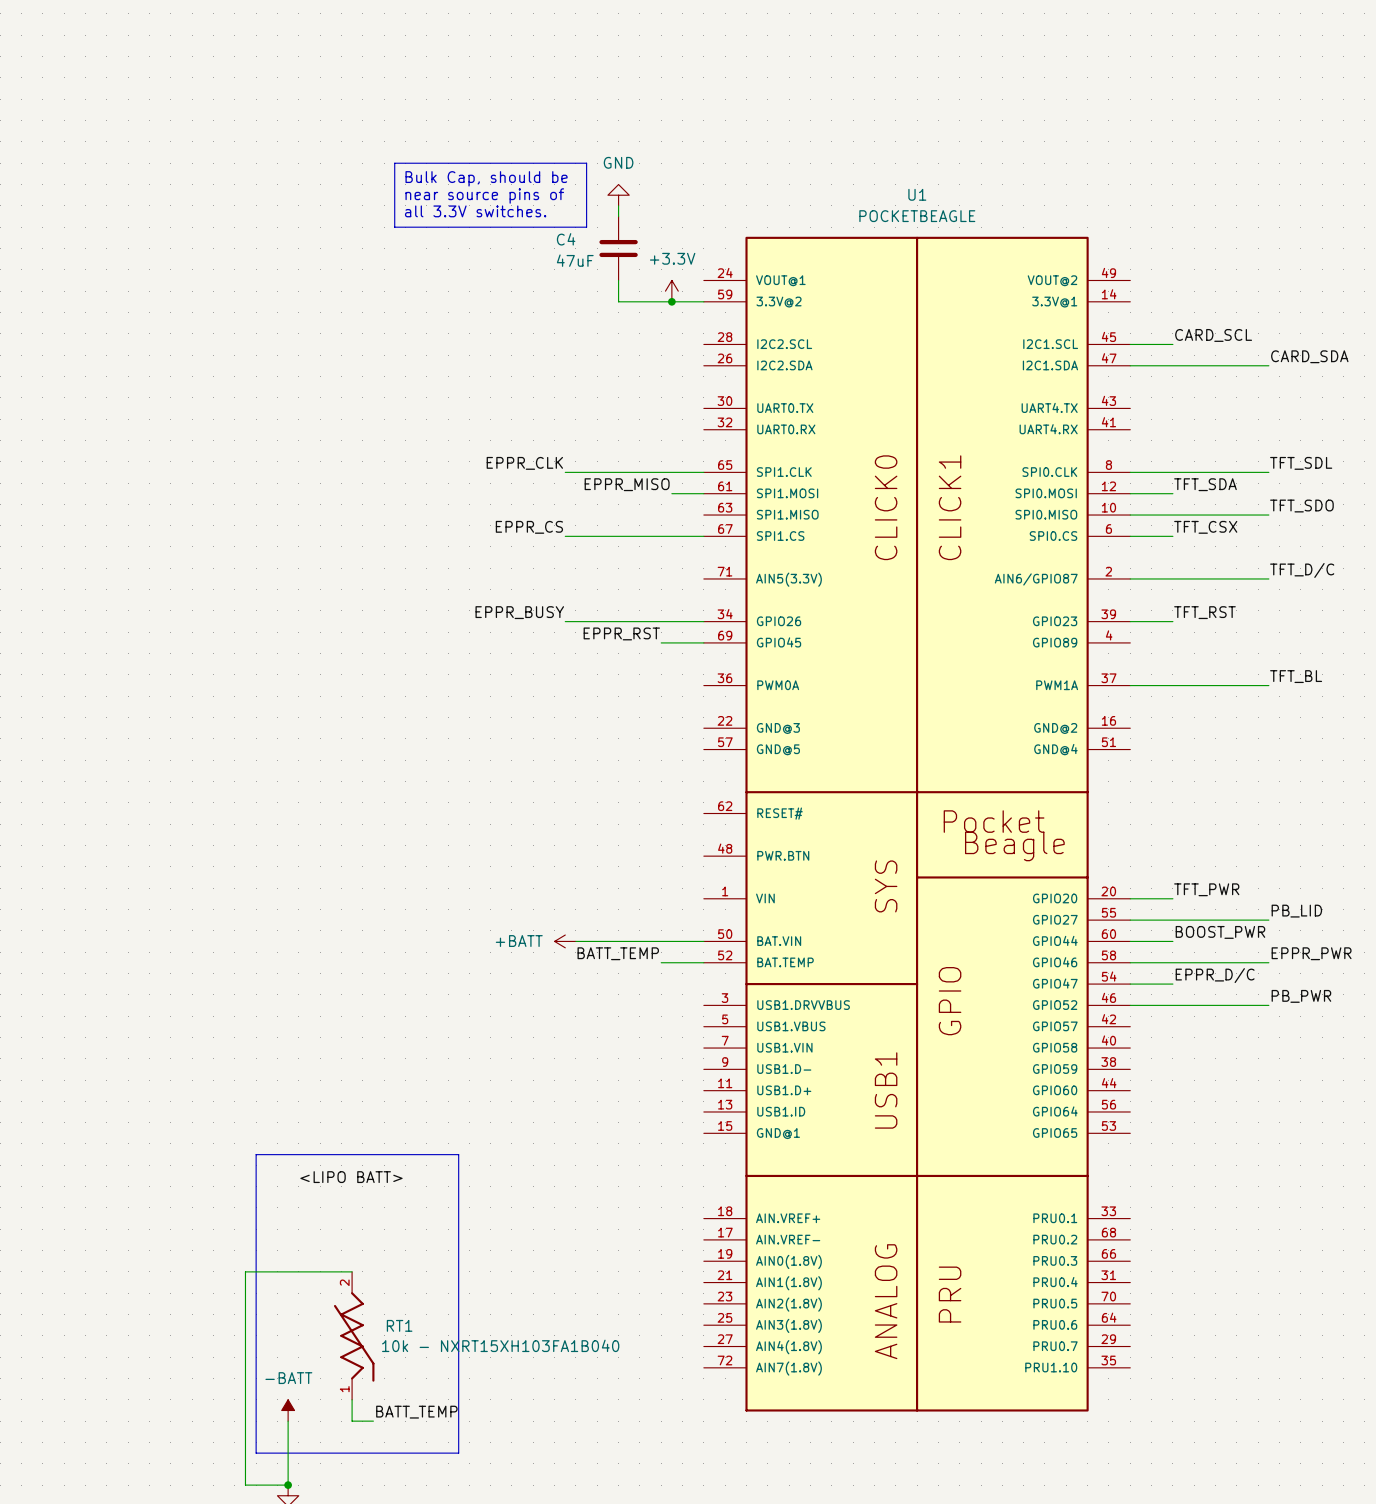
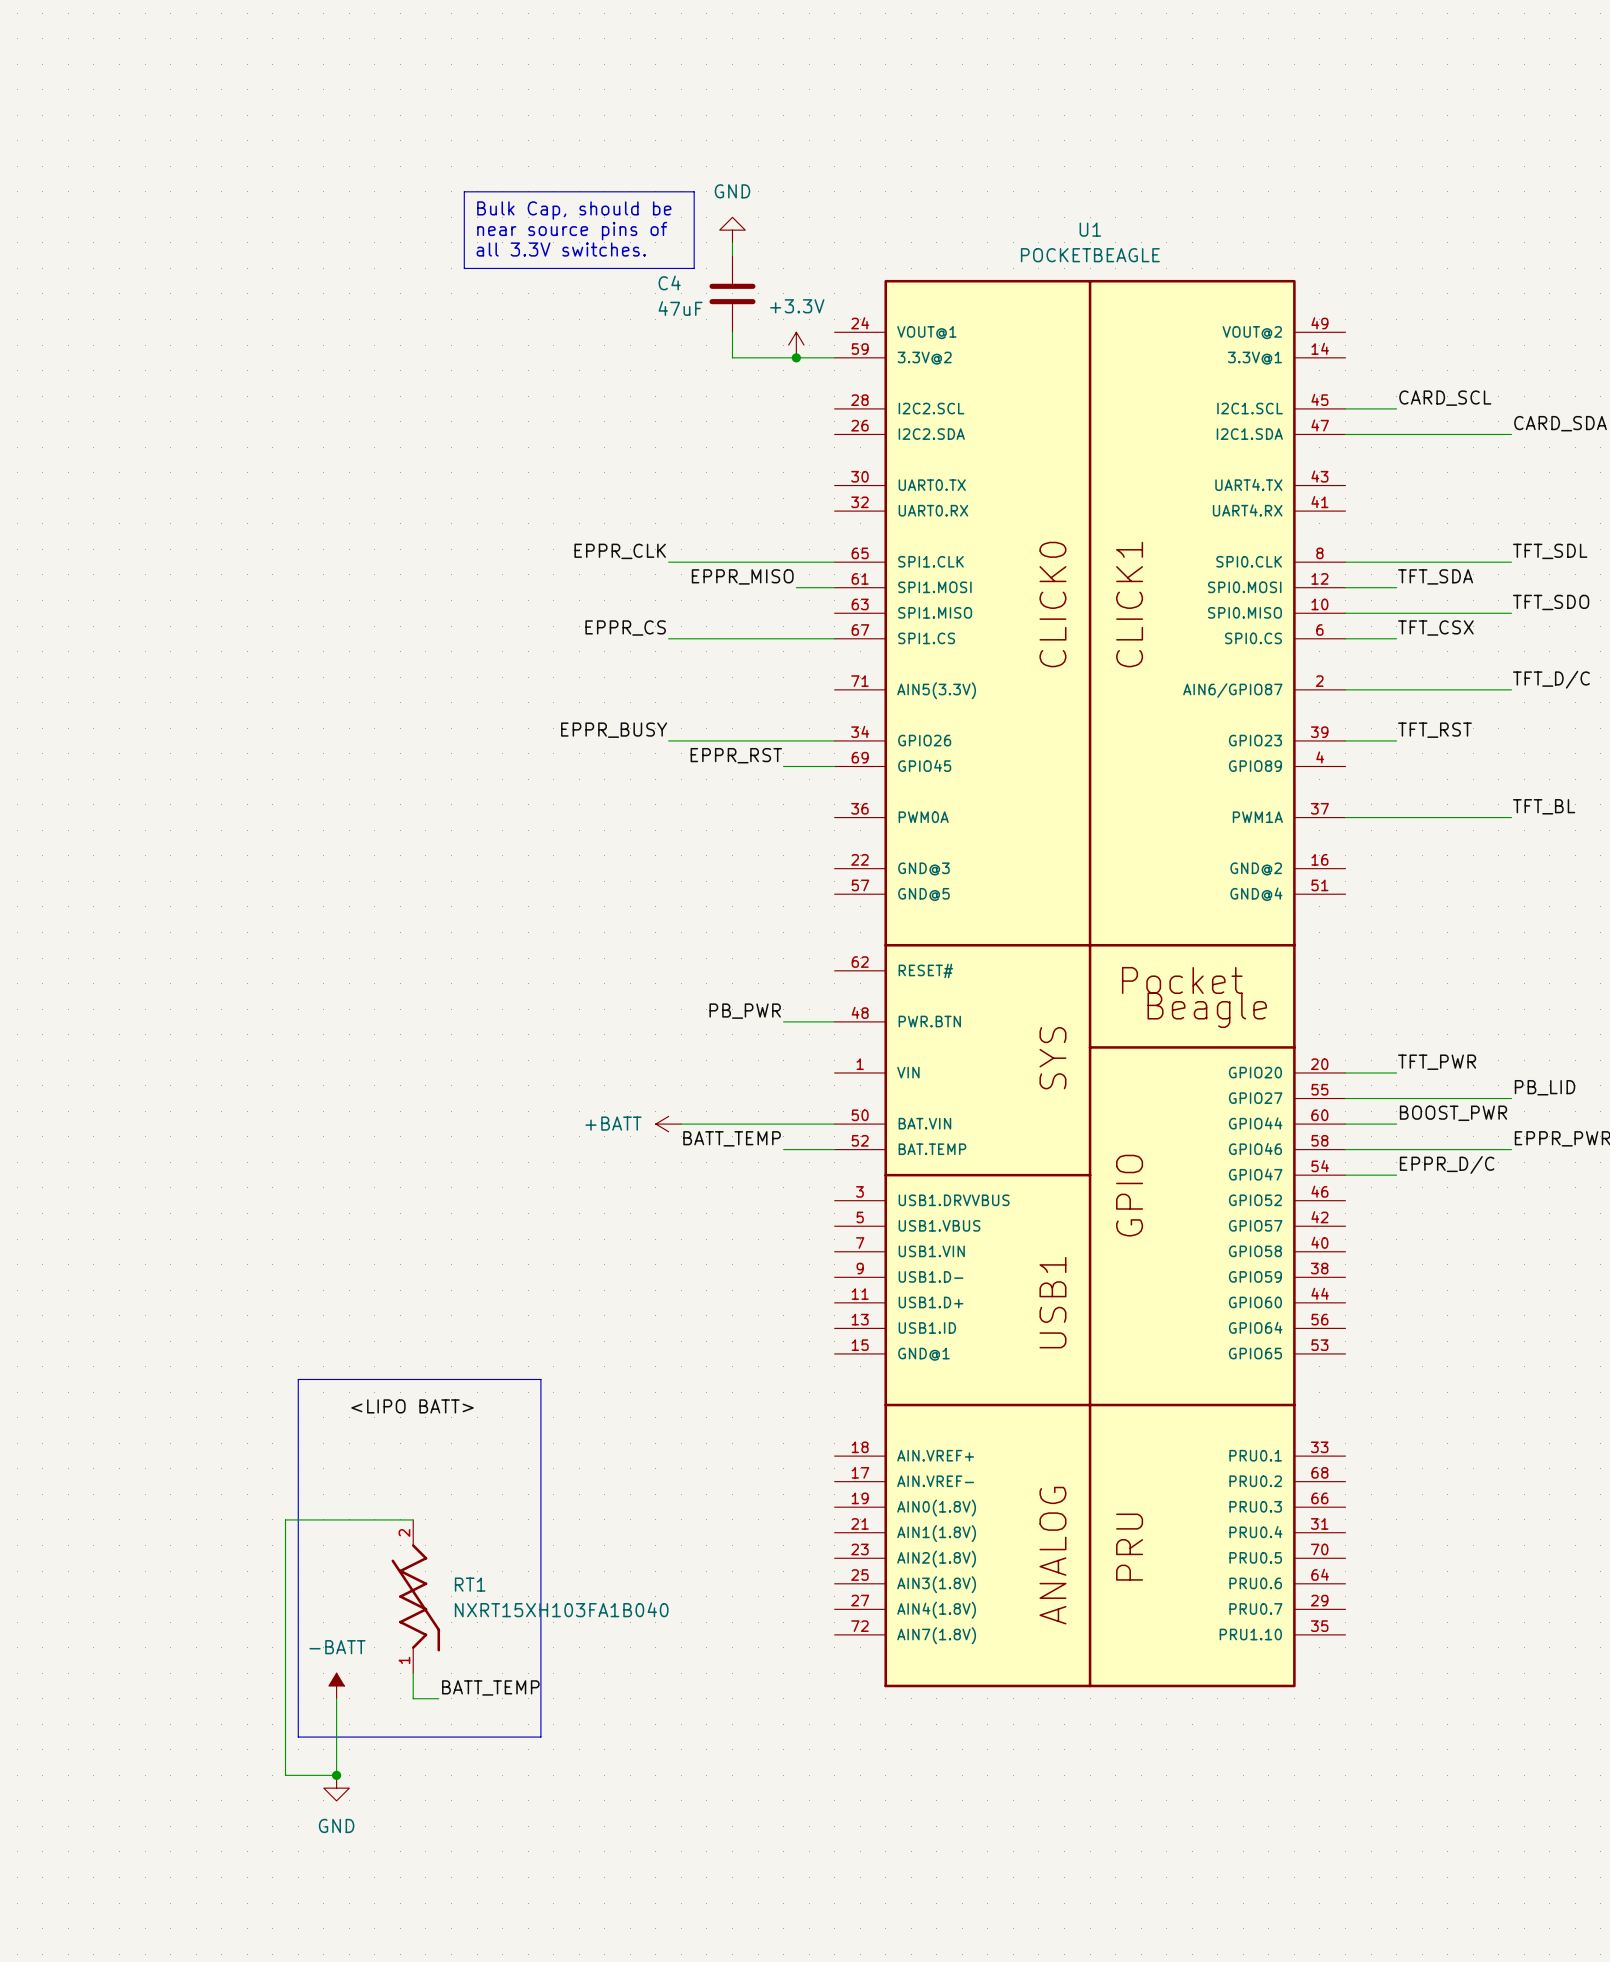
label: none -> PB_PWR (745, 1011)
wire: none -> (783, 1021) (834, 1021)
label: PB_PWR (1301, 996) -> none
wire: (1130, 1005) (1268, 1005) -> none
RT1 value: 10k - NXRT15XH103FA1B040 (500, 1345) -> NXRT15XH103FA1B040 (561, 1609)

